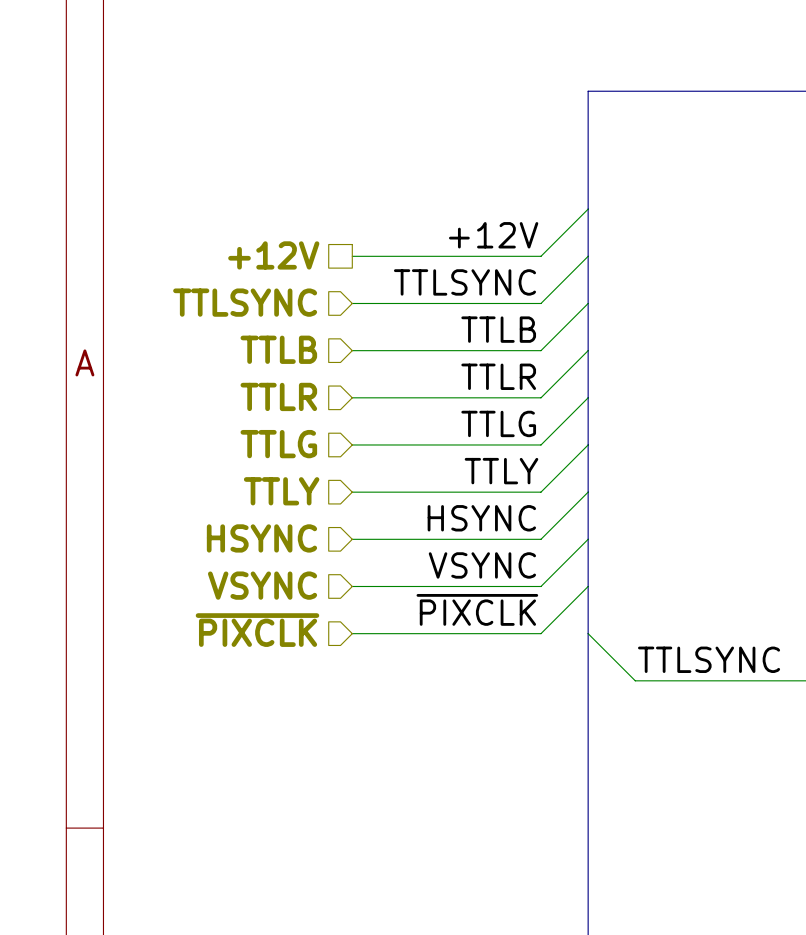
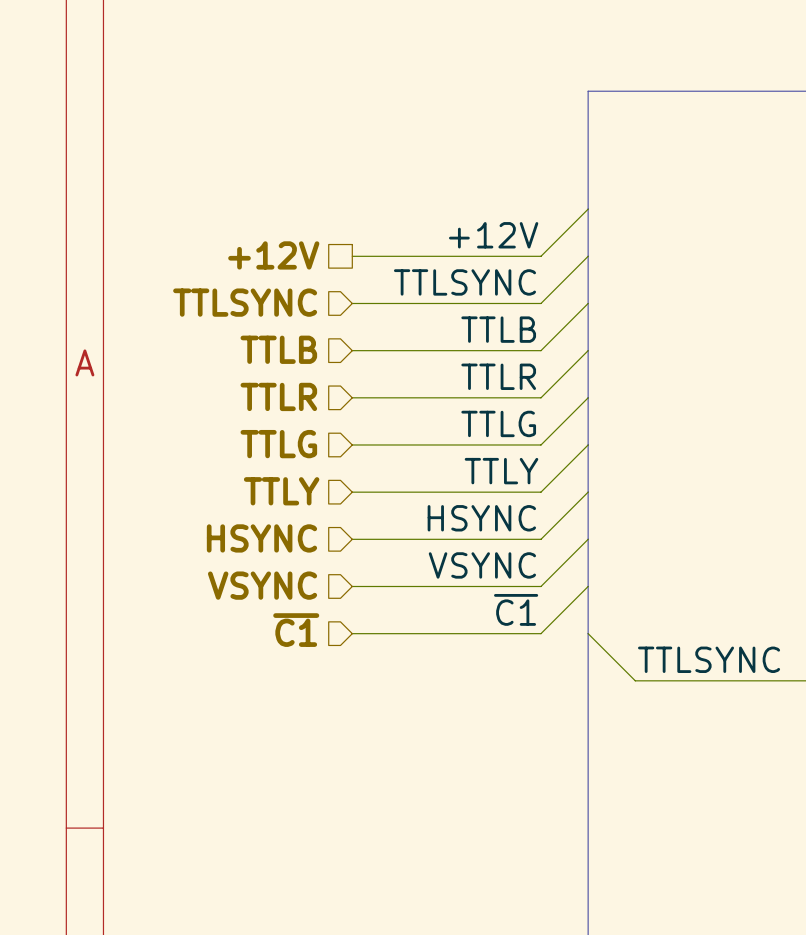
label: ~{PIXCLK} (477, 609) -> ~{C1} (516, 609)
hierarchical label: ~{PIXCLK} (257, 630) -> ~{C1} (296, 630)

